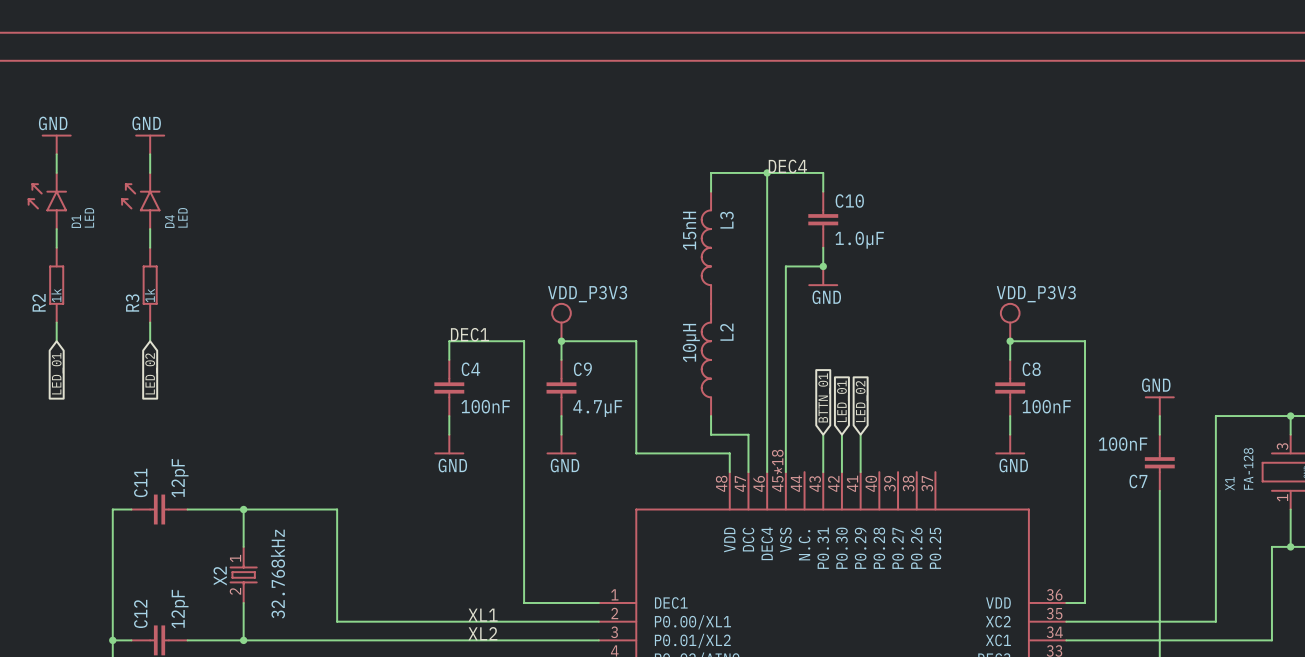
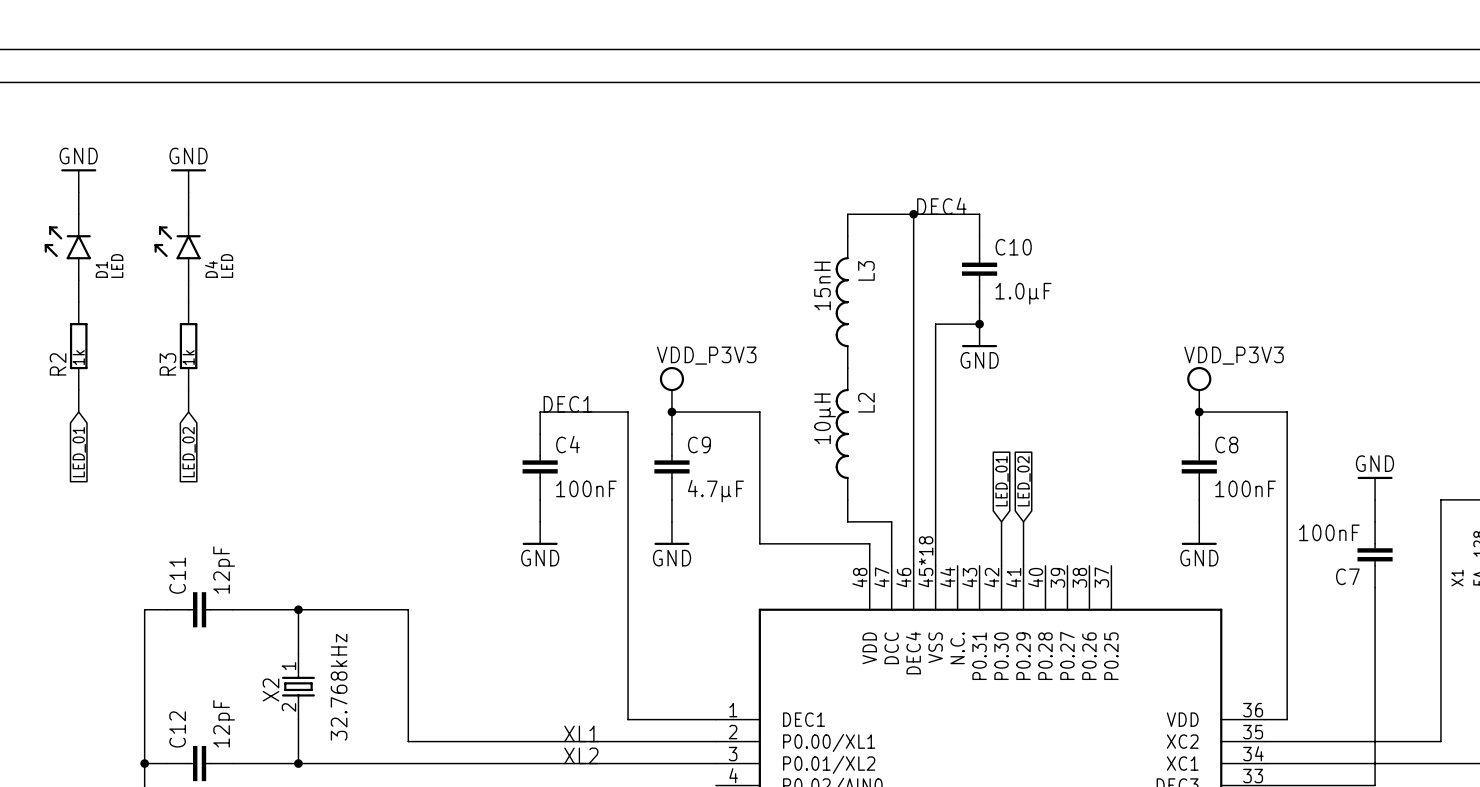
global label: BTTN_01 (824, 397) -> none
wire: (823, 434) (823, 472) -> none

